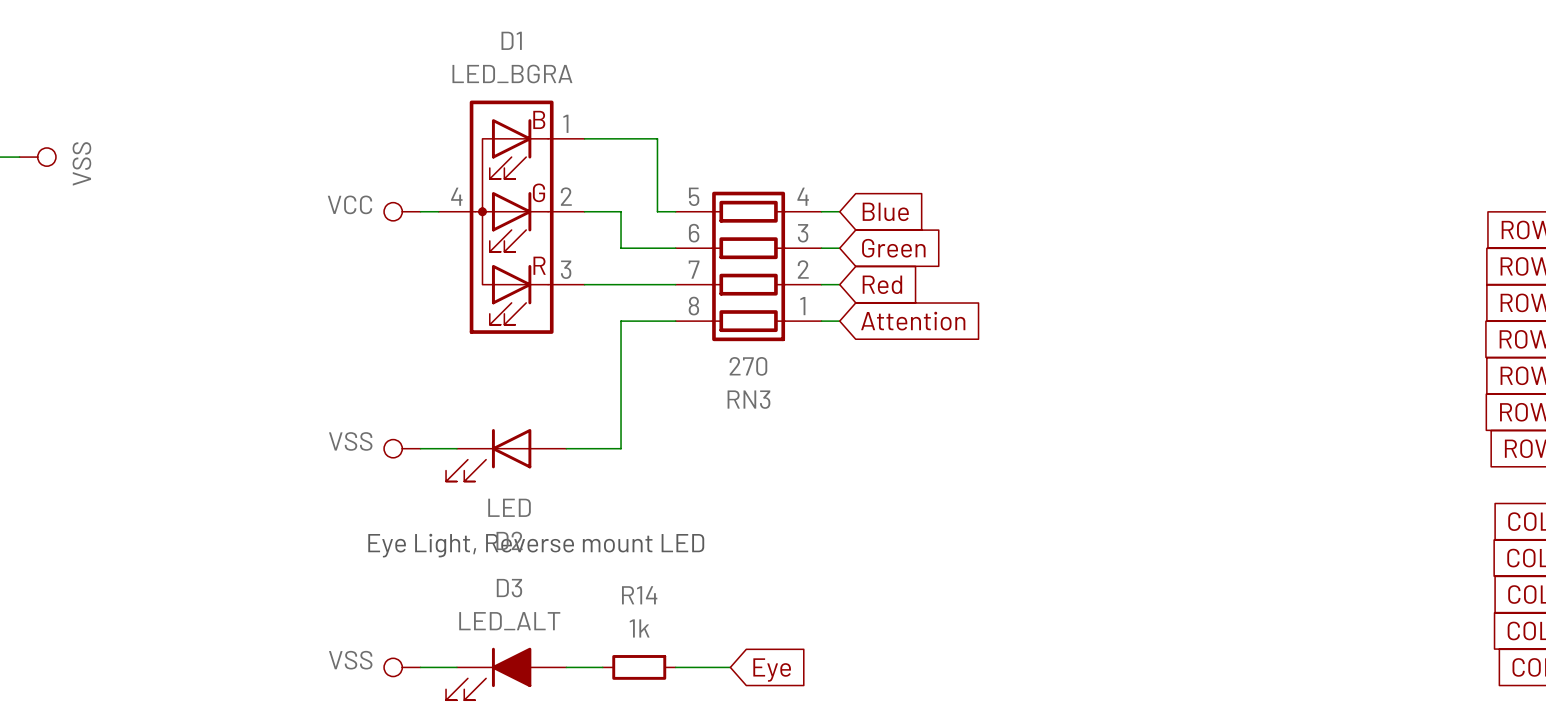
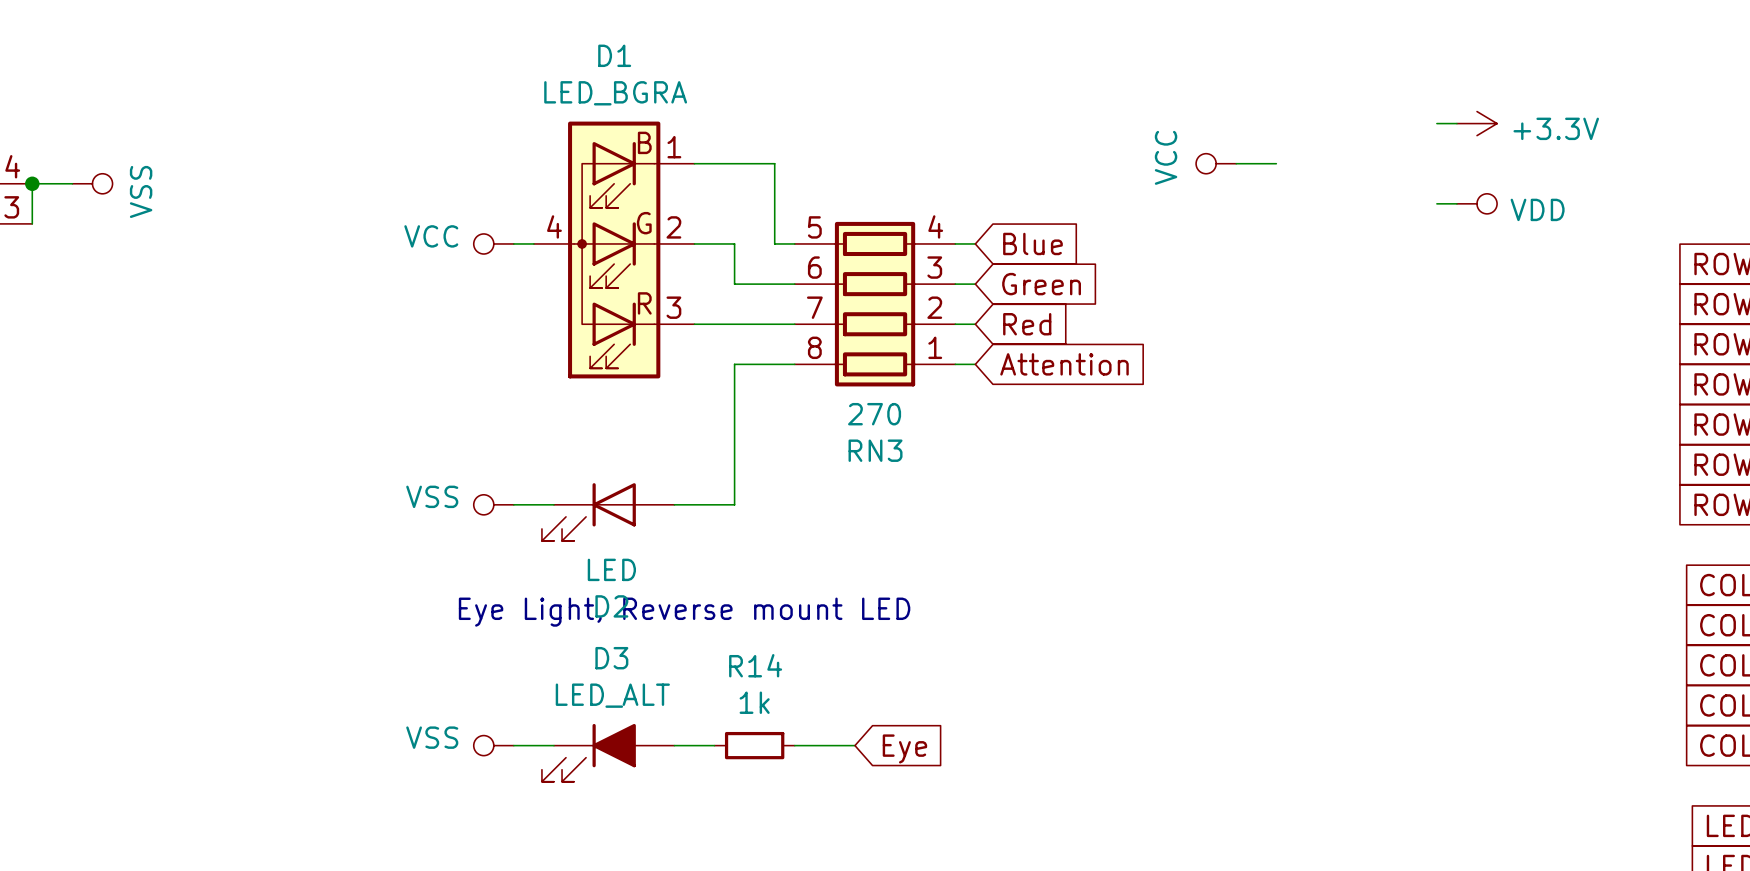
wire: none -> (1436, 123) (1456, 123)
power symbol: none -> +3.3V (1477, 123)
power symbol: none -> VCC (1216, 163)
wire: none -> (1236, 163) (1276, 163)
wire: none -> (1436, 203) (1456, 203)
power symbol: none -> VDD (1477, 203)

